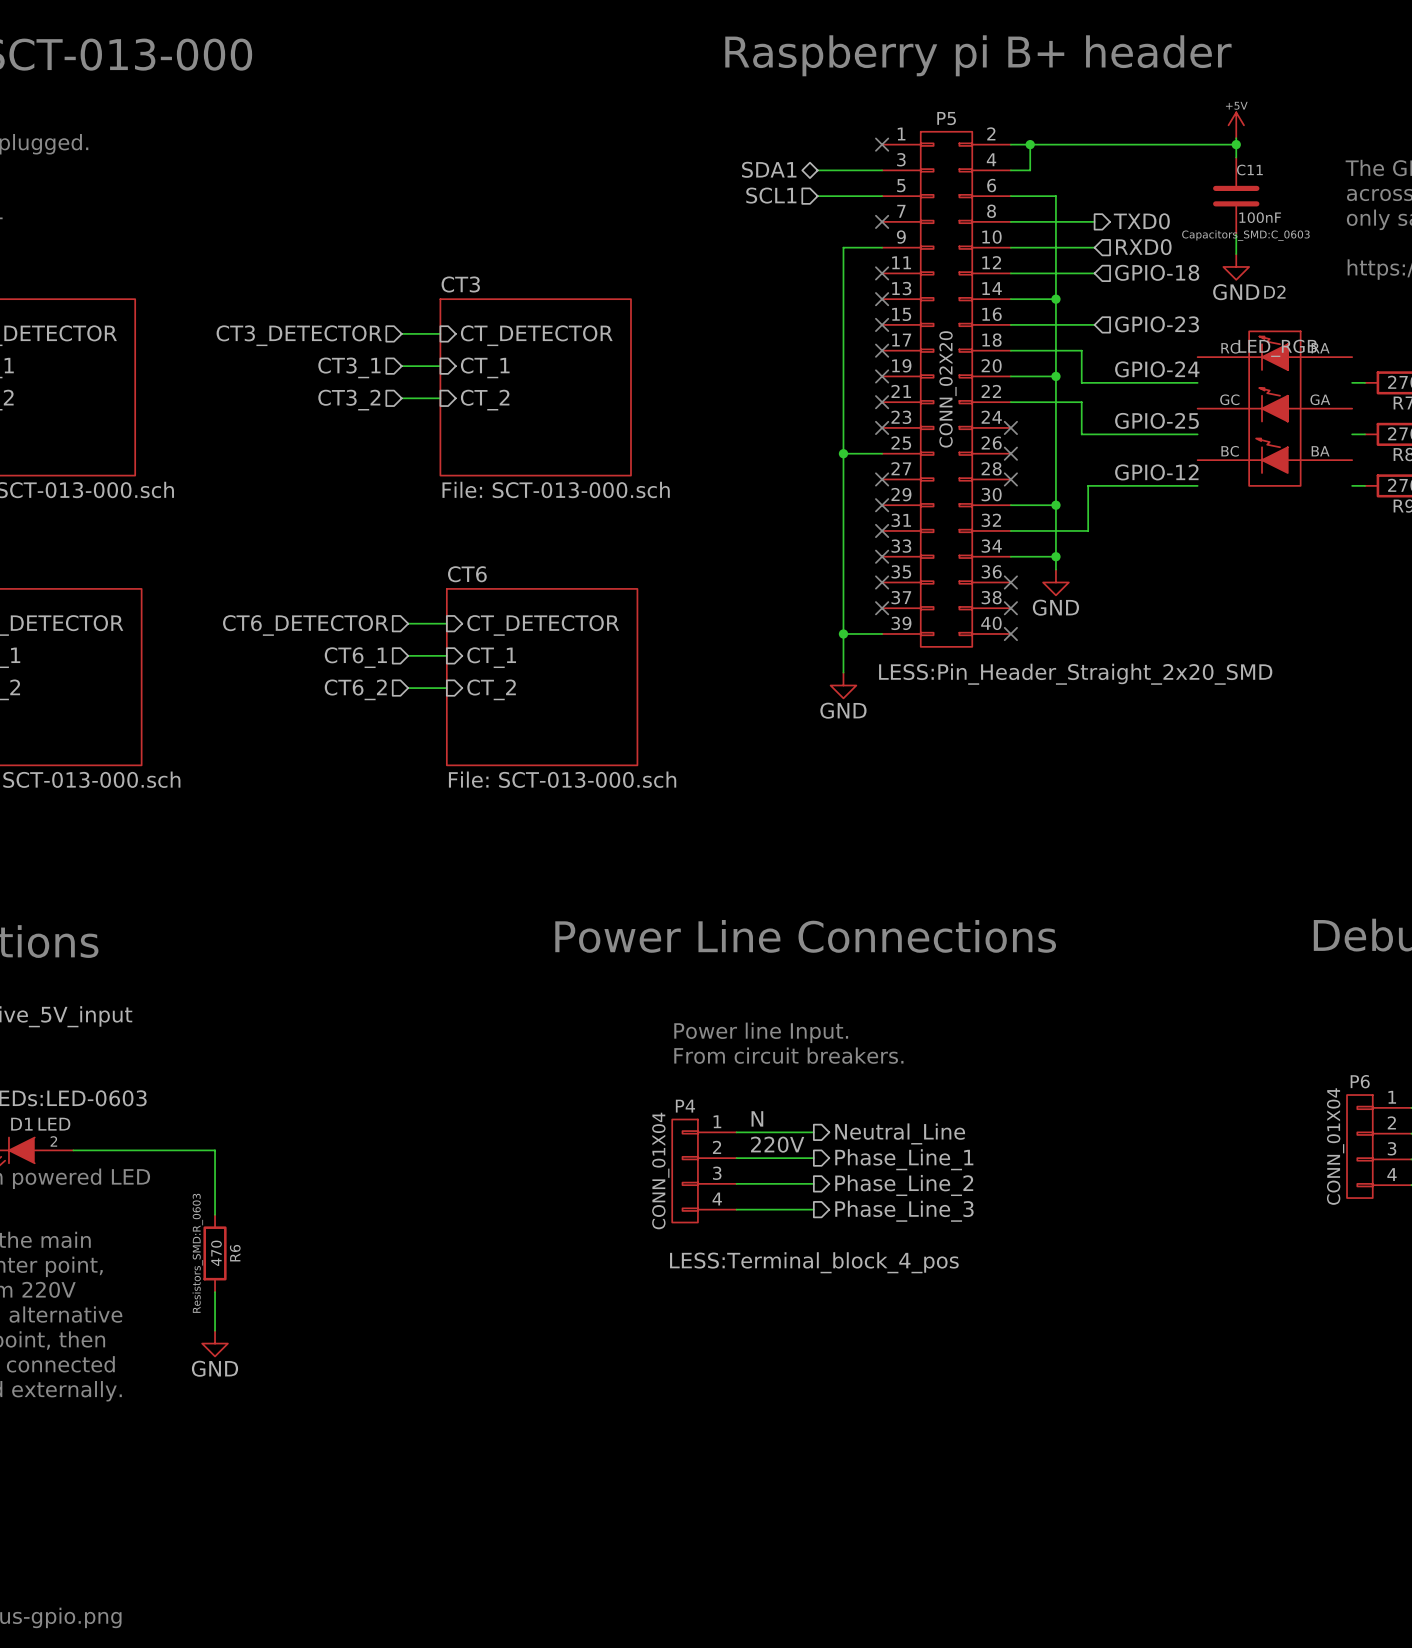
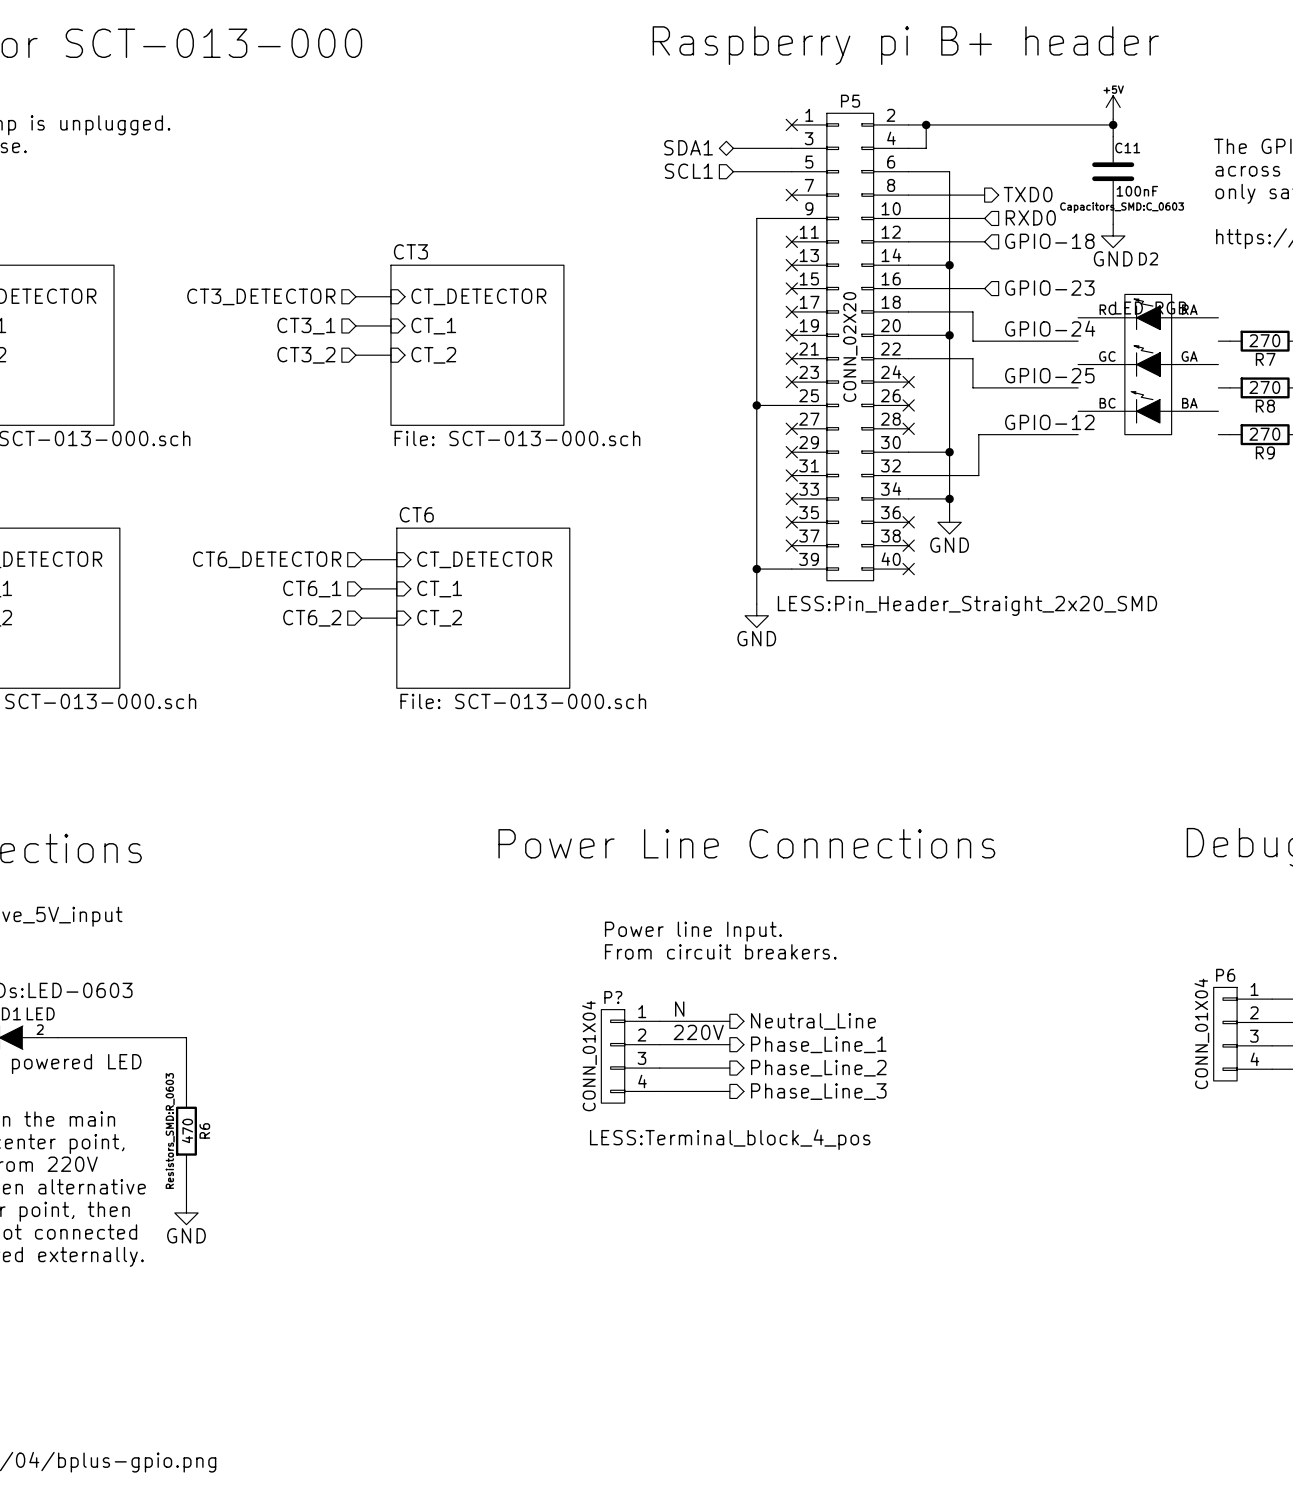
P4 name: P4 (685, 1106) -> P? (613, 997)

